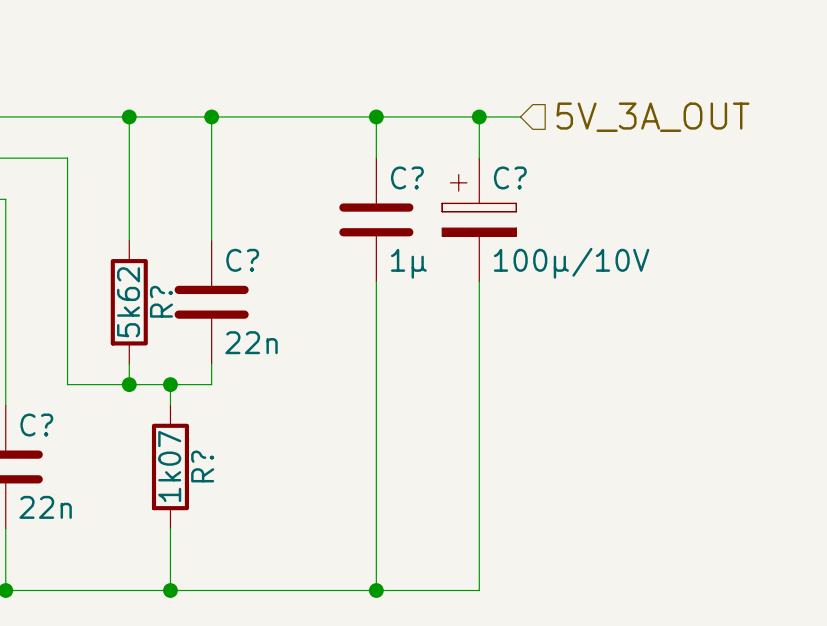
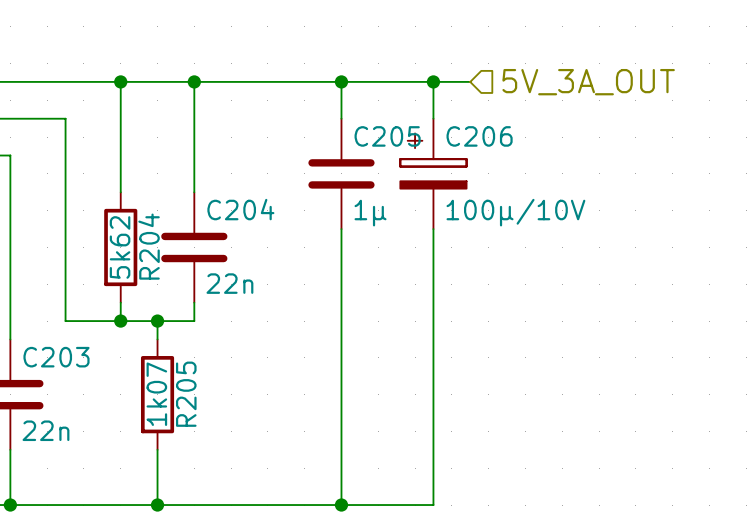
C? name: C? (407, 177) -> C205 (387, 136)
C? name: C? (510, 177) -> C206 (479, 136)
C? name: C? (242, 260) -> C204 (240, 209)
R? name: R? (161, 301) -> R204 (149, 246)
C? name: C? (36, 425) -> C203 (56, 357)
R? name: R? (202, 466) -> R205 (186, 394)

